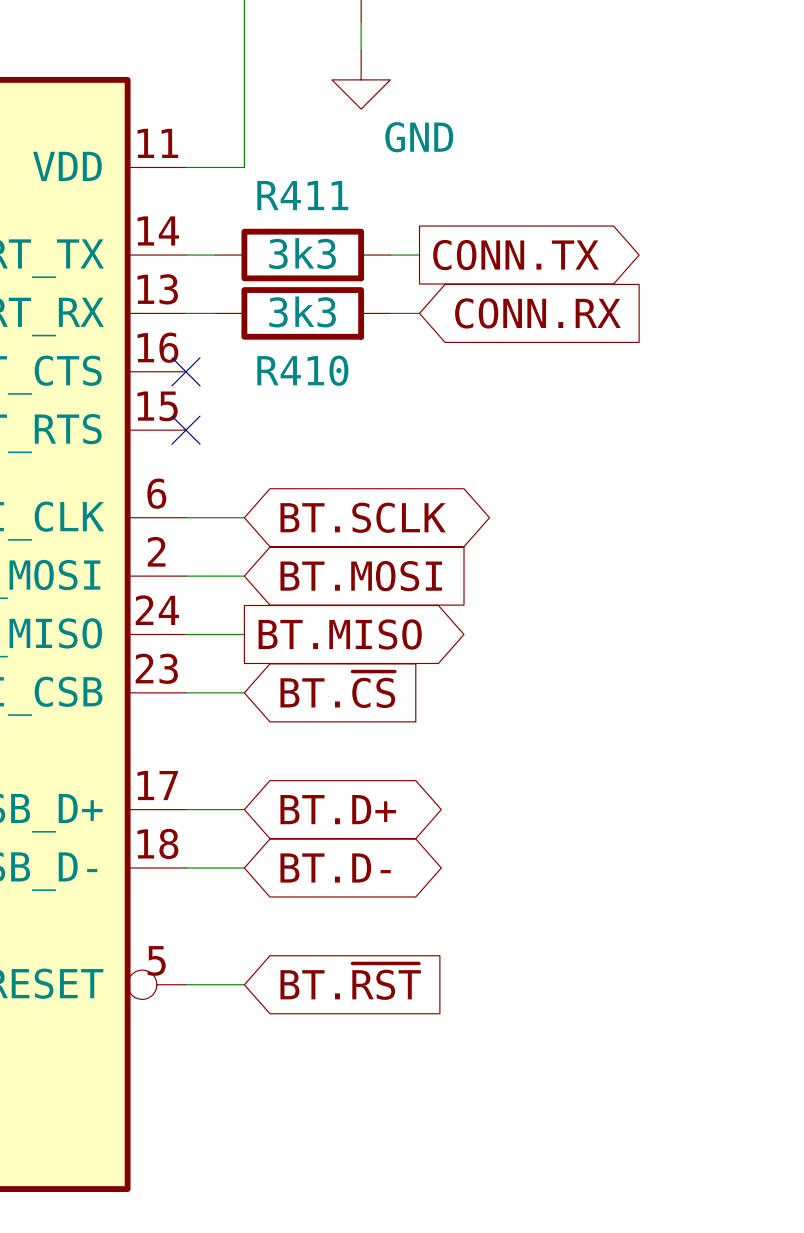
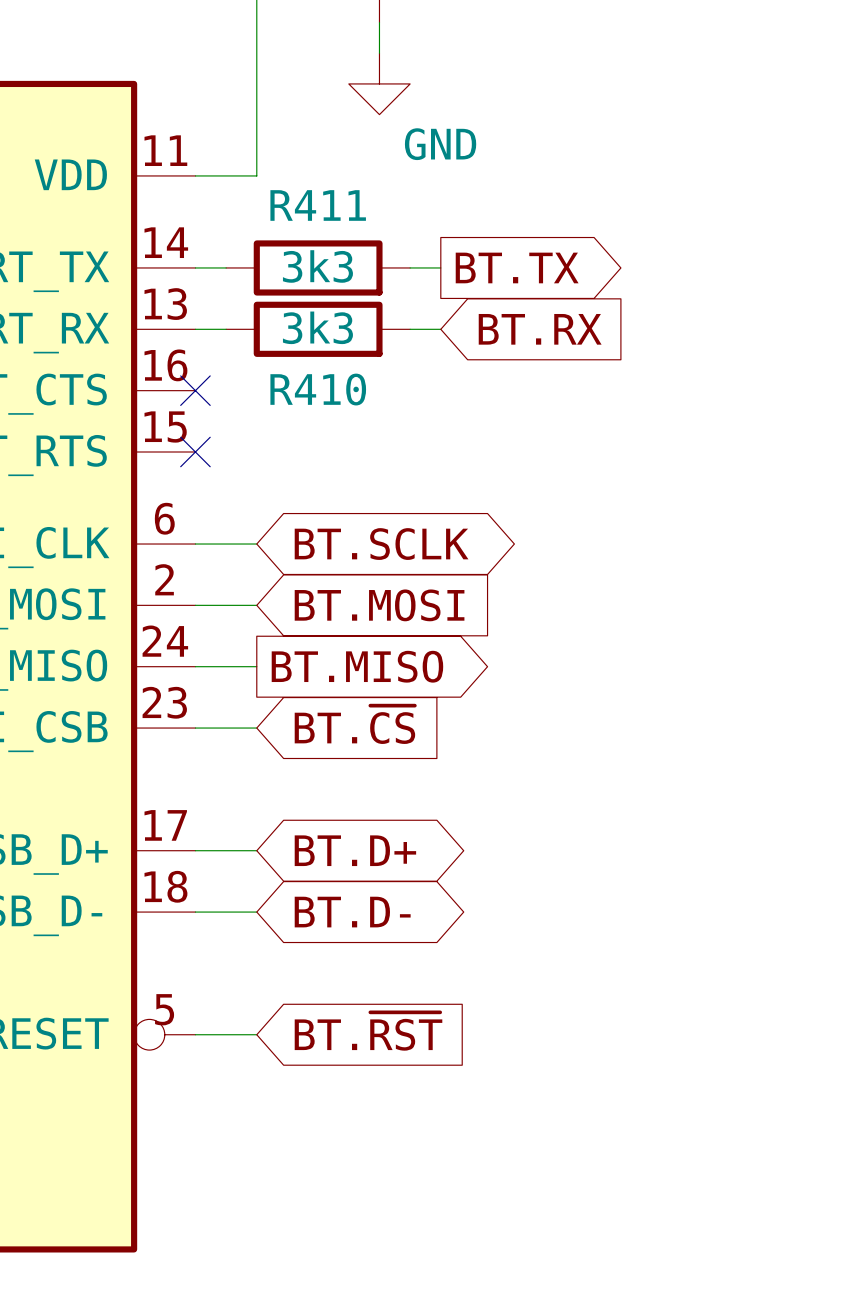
global label: CONN.TX (516, 255) -> BT.TX (517, 267)
global label: CONN.RX (537, 313) -> BT.RX (540, 329)

